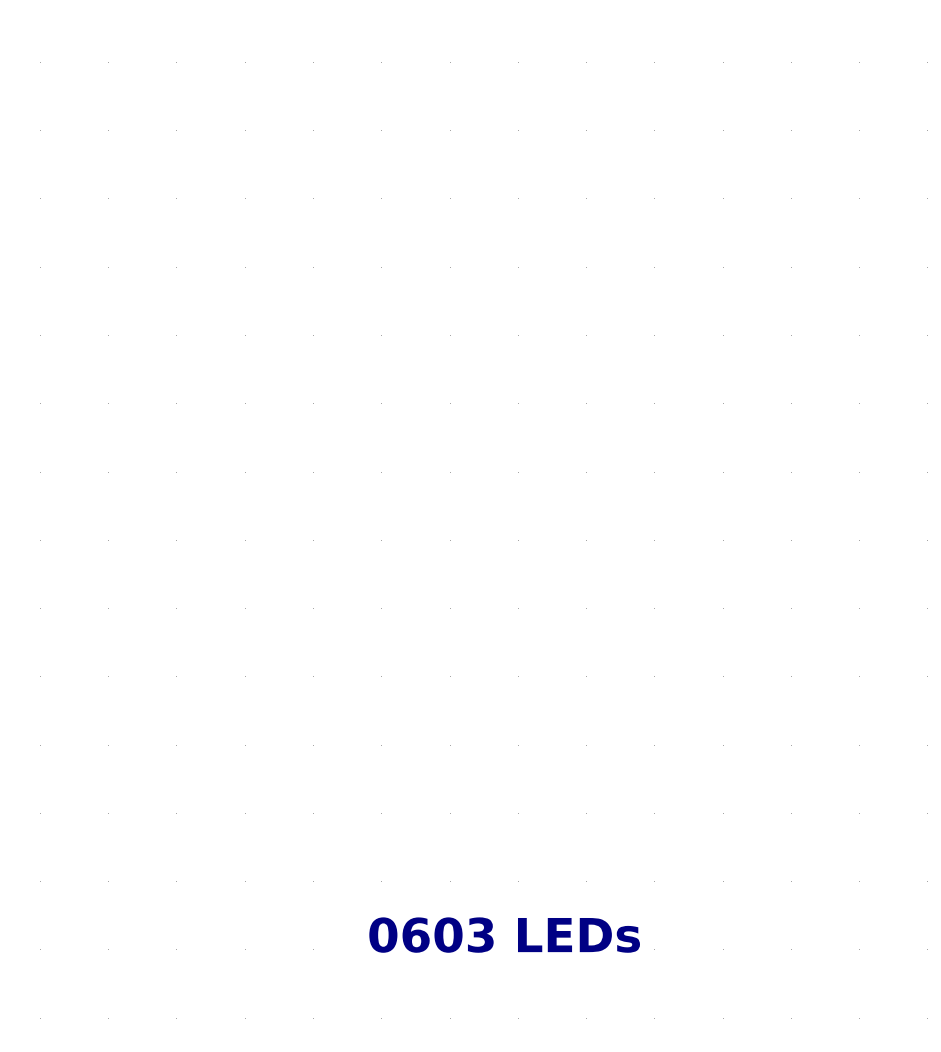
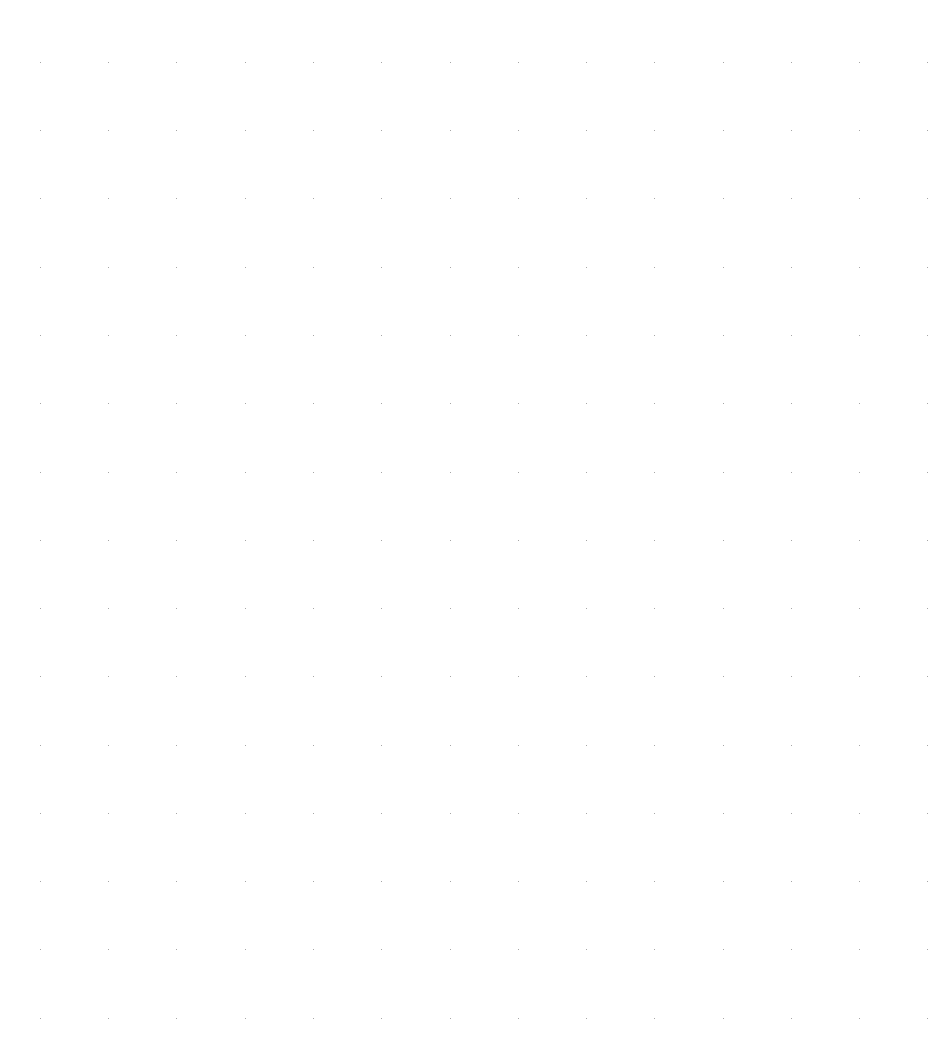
text: 0603 LEDs (504, 935) -> none

